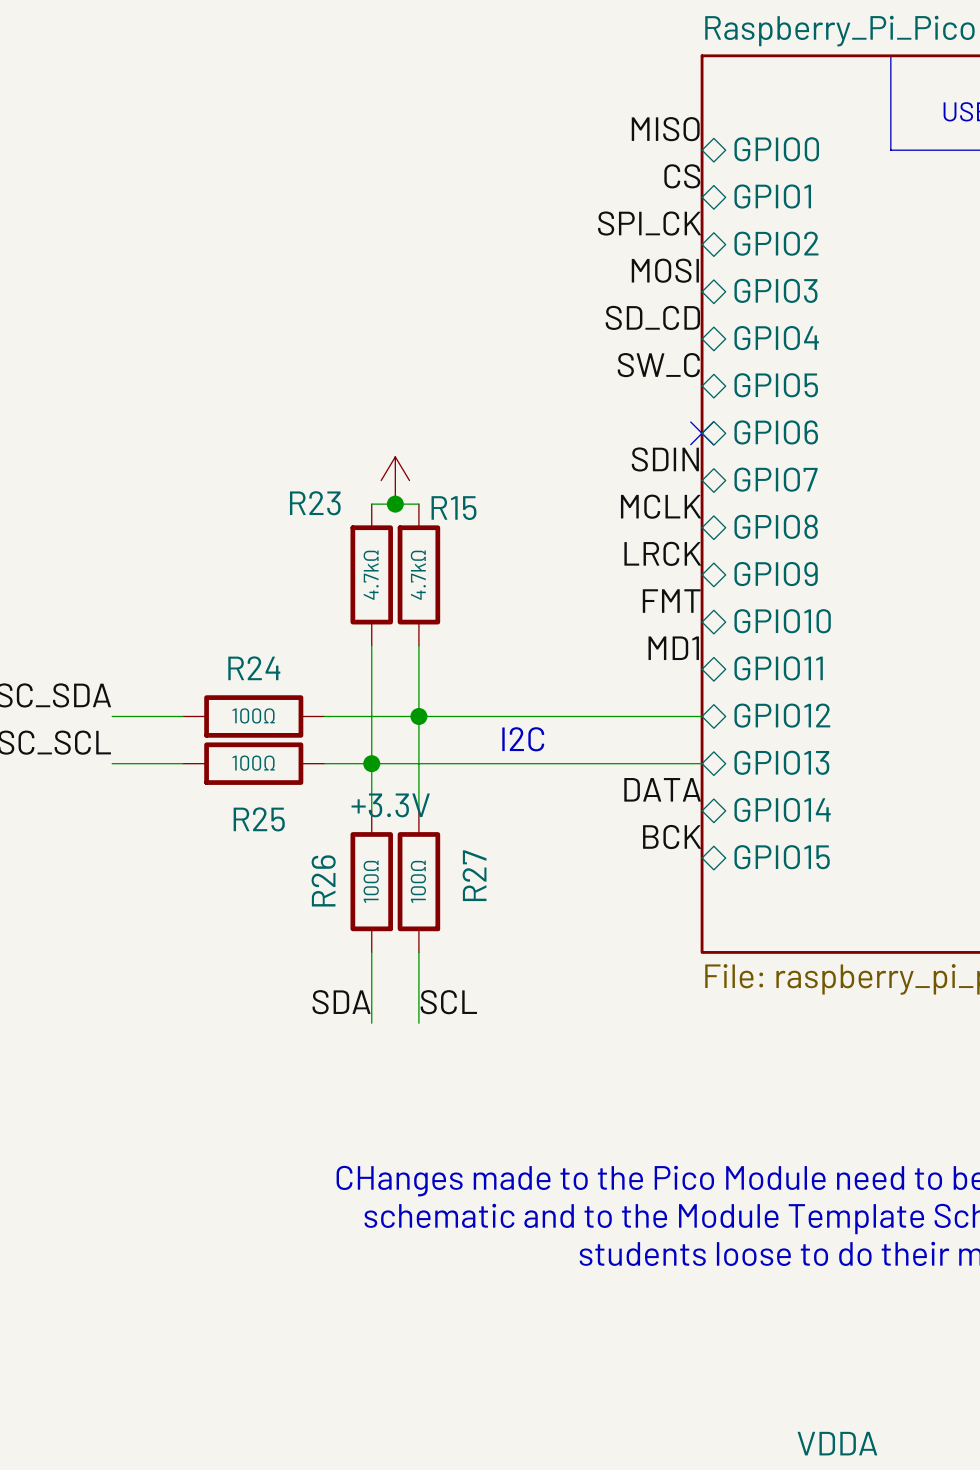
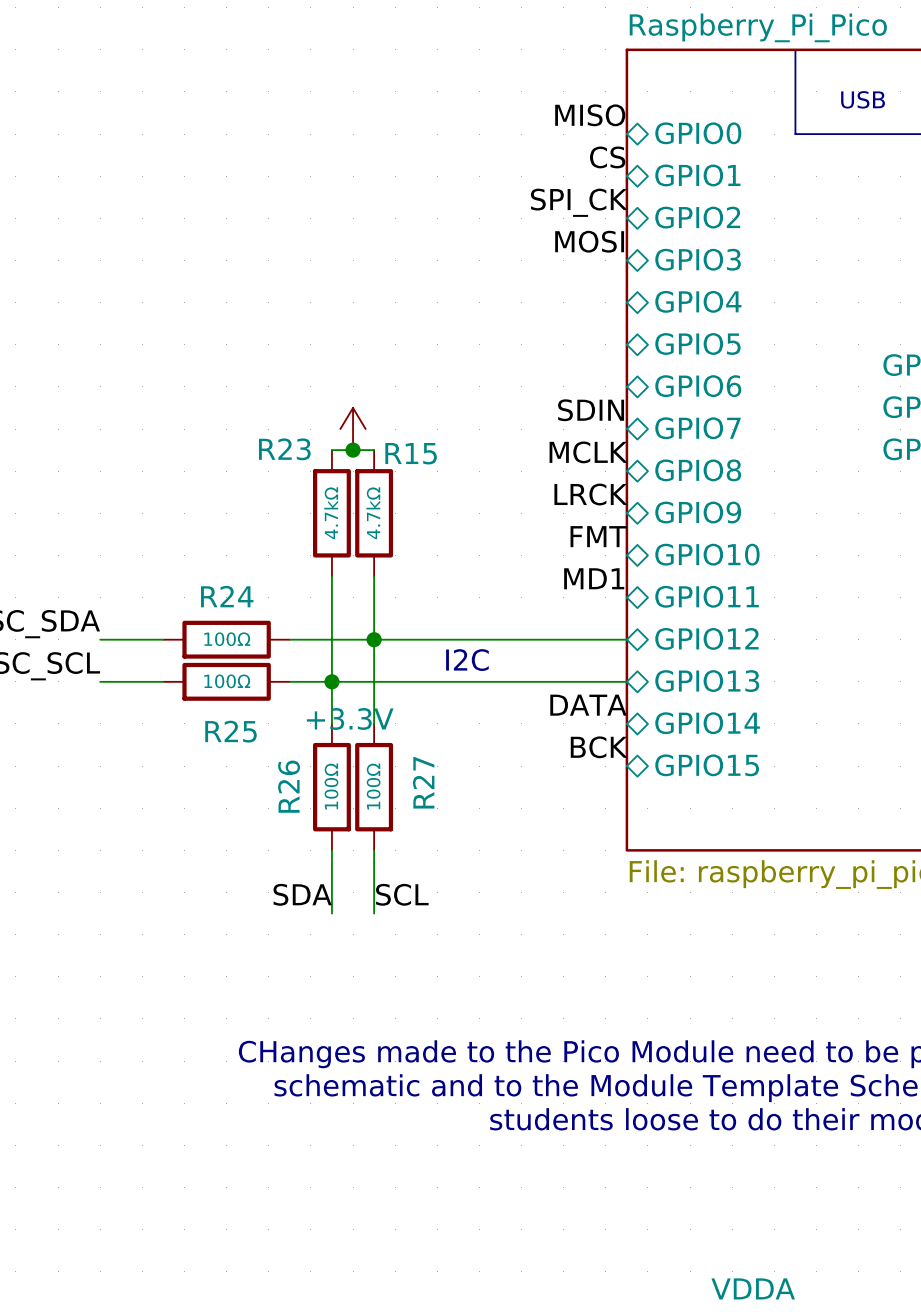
label: SD_CD (652, 317) -> none
label: SW_C (658, 365) -> none
no-connect mark: (702, 433) -> none

